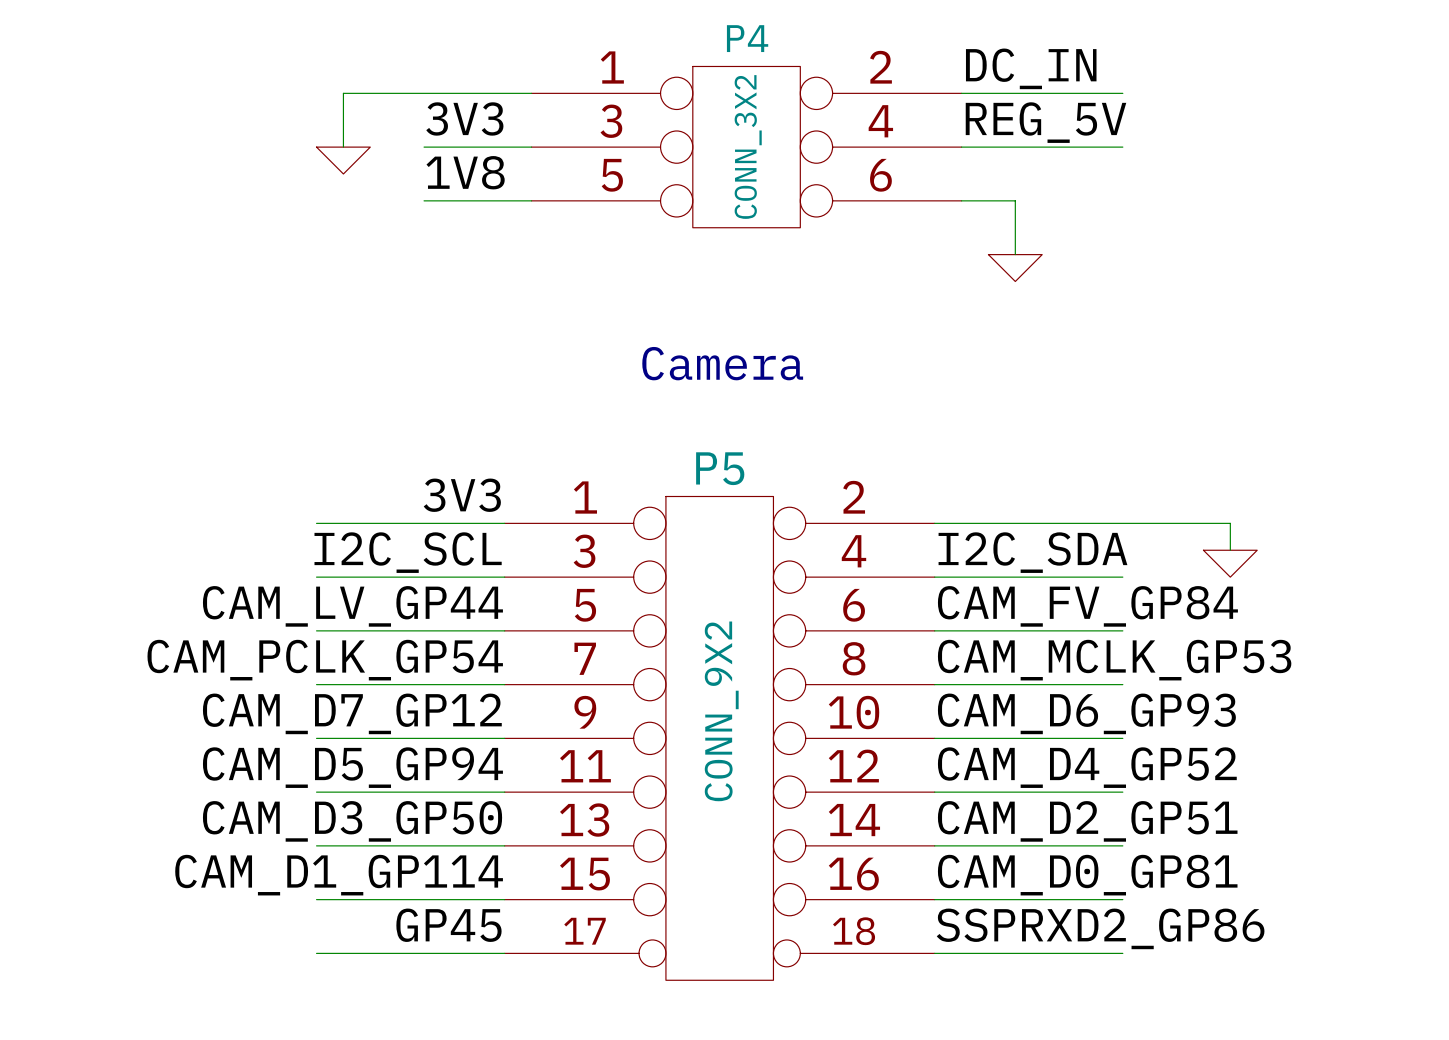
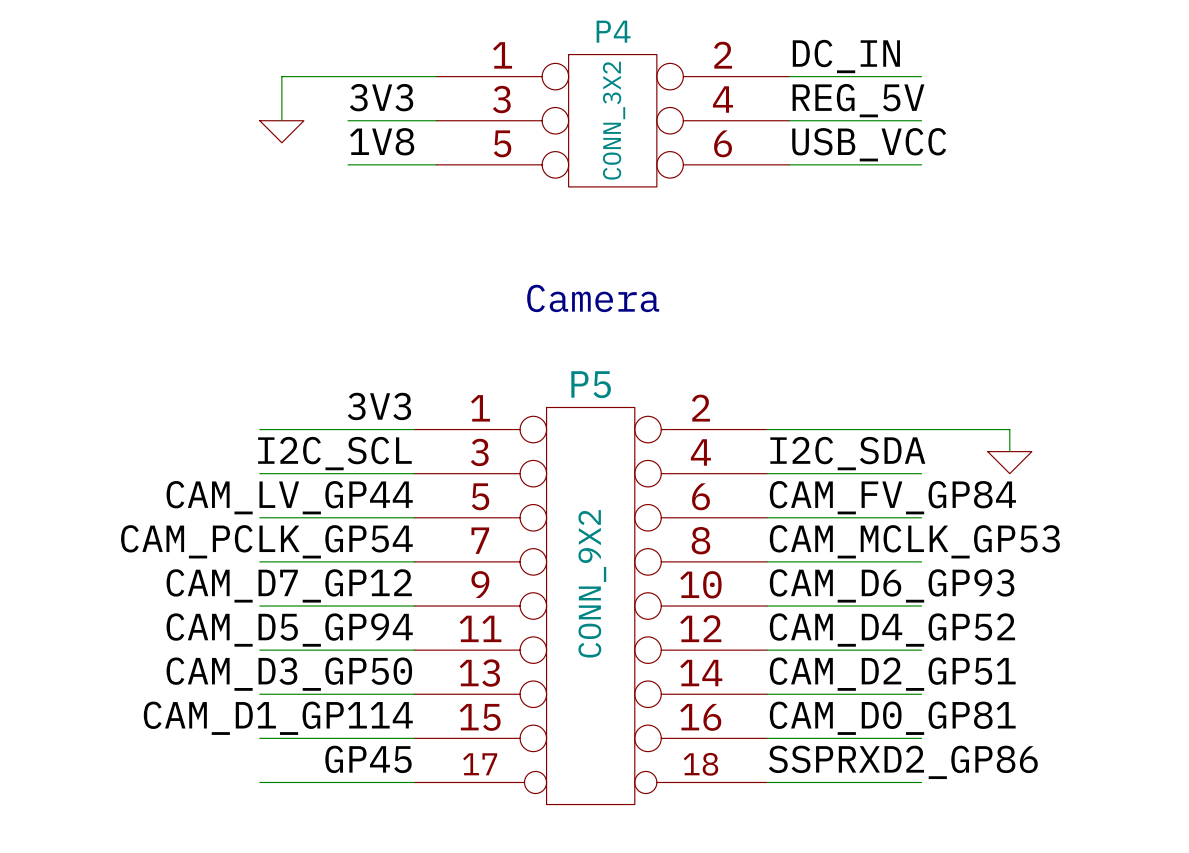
label: none -> USB_VCC (869, 144)
wire: (1015, 200) (1015, 254) -> (833, 164) (921, 164)
power symbol: (1015, 268) -> none

